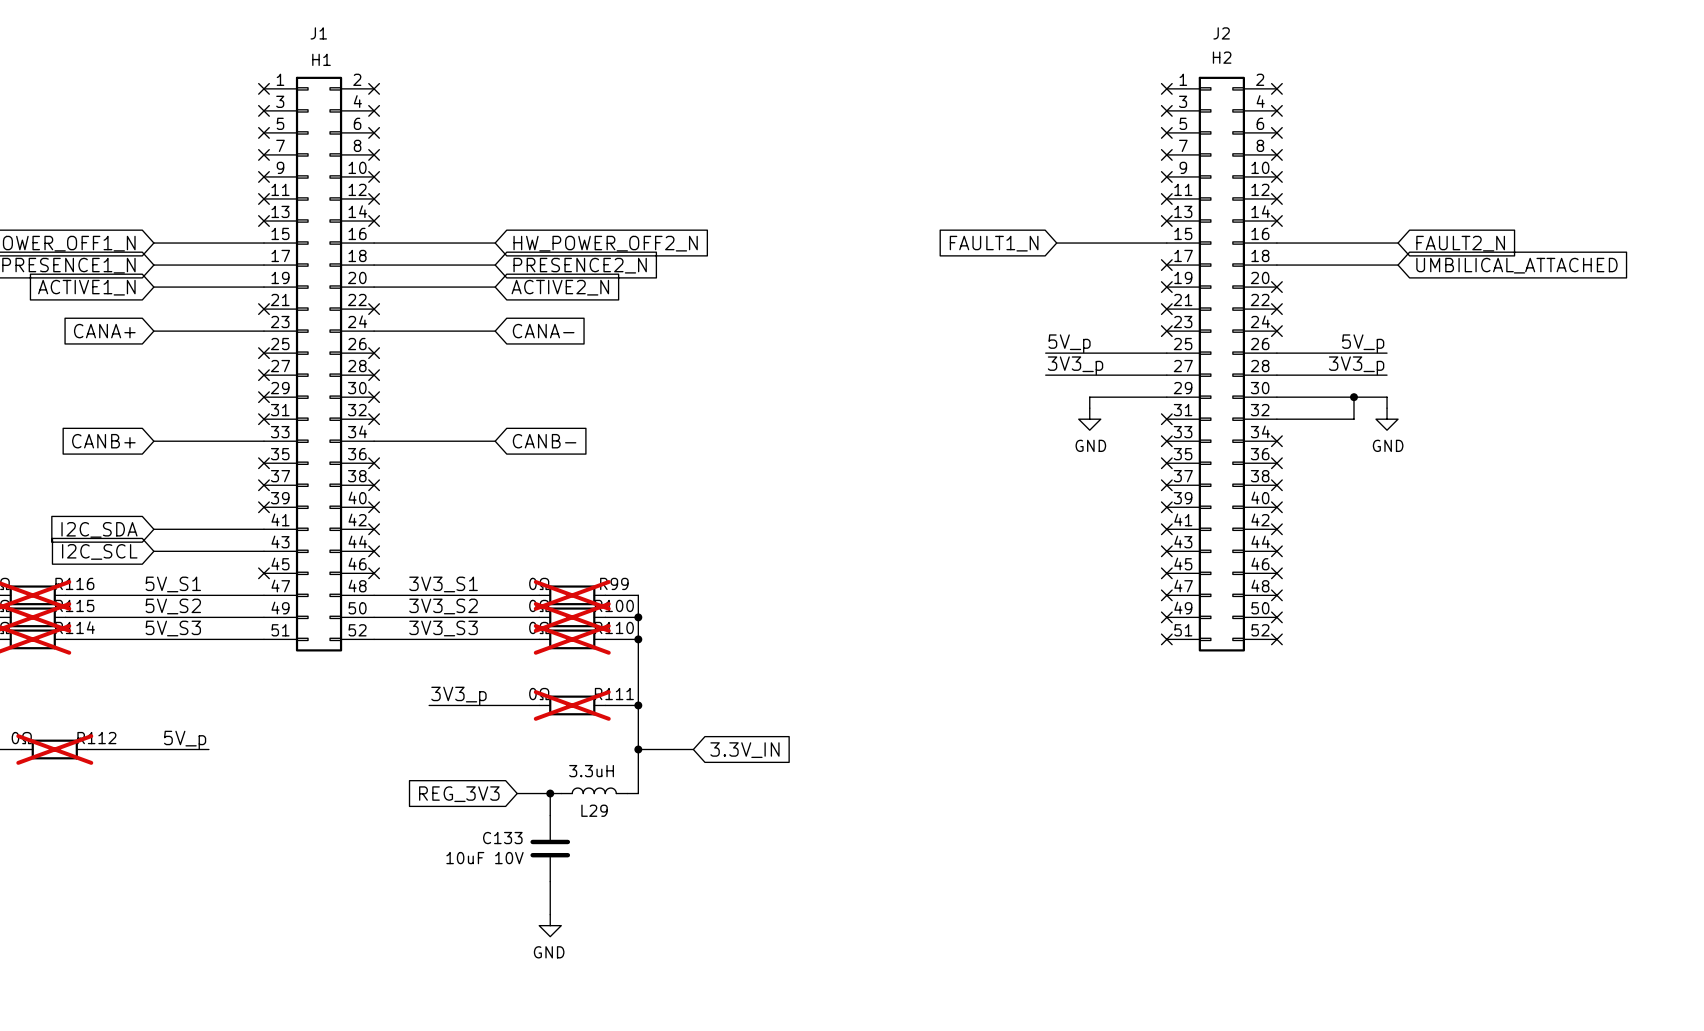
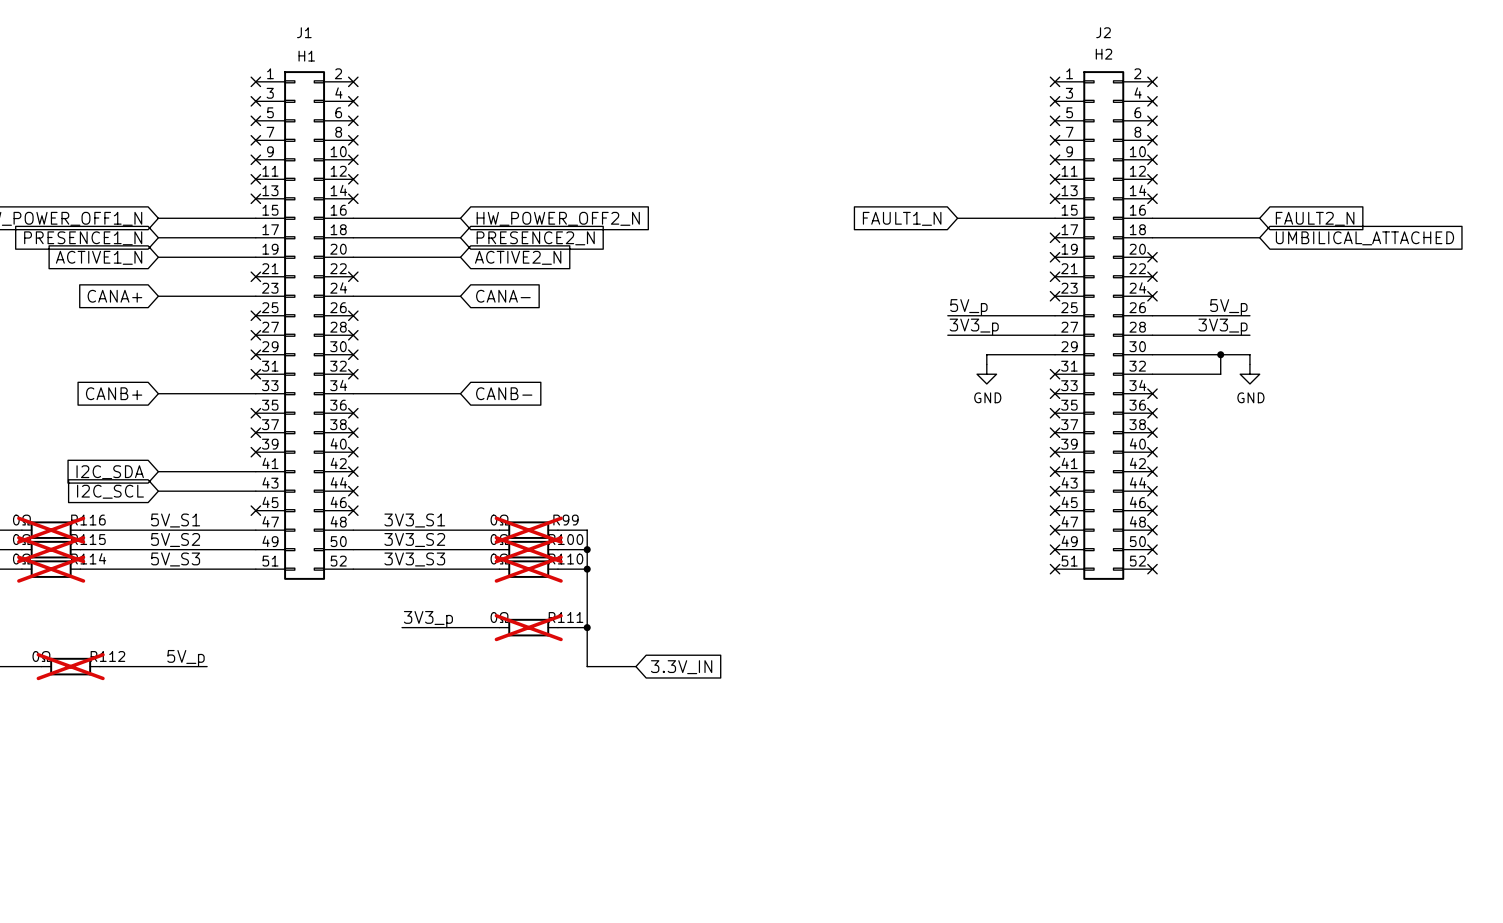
wire: (638, 749) (638, 793) (627, 793) -> none
junction: (638, 749) -> none
L29: 3.3uH (594, 790) -> none
wire: (517, 793) (561, 793) -> none
wire: (550, 793) (550, 815) -> none
junction: (550, 793) -> none
global label: REG_3V3 (459, 794) -> none
C133: 10uF 10V (550, 848) -> none
wire: (550, 881) (550, 914) -> none
power symbol: GND (550, 925) -> none

